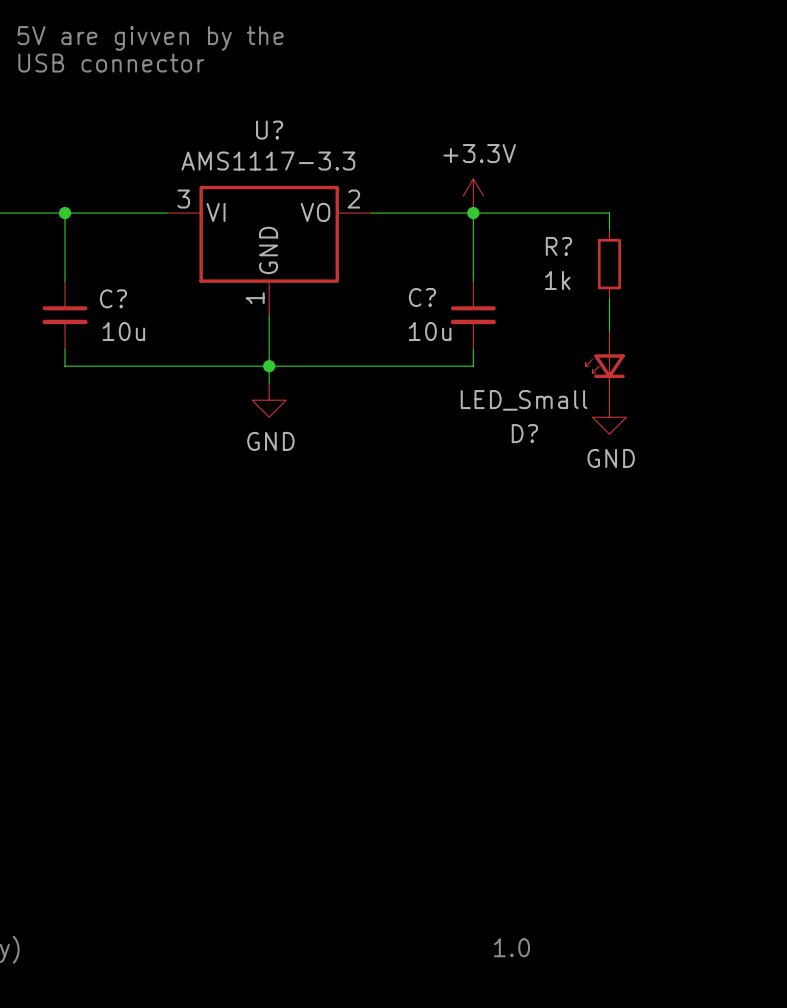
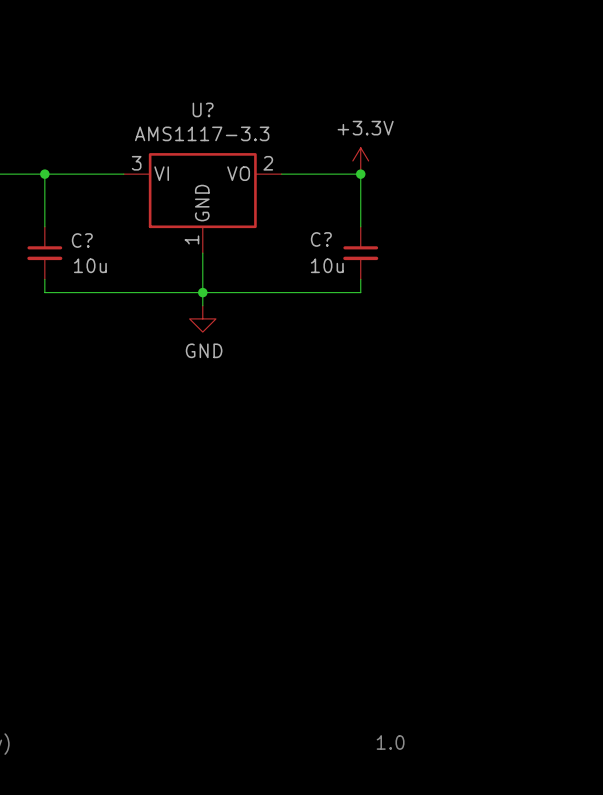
text: 5V are givven by the (150, 38) -> none
text: USB connector (111, 63) -> none
wire: (473, 213) (609, 213) (609, 230) -> none
R?: 1k (609, 264) -> none
wire: (609, 298) (609, 332) -> none
D?: LED_Small (605, 366) -> none
power symbol: GND (609, 417) -> none

